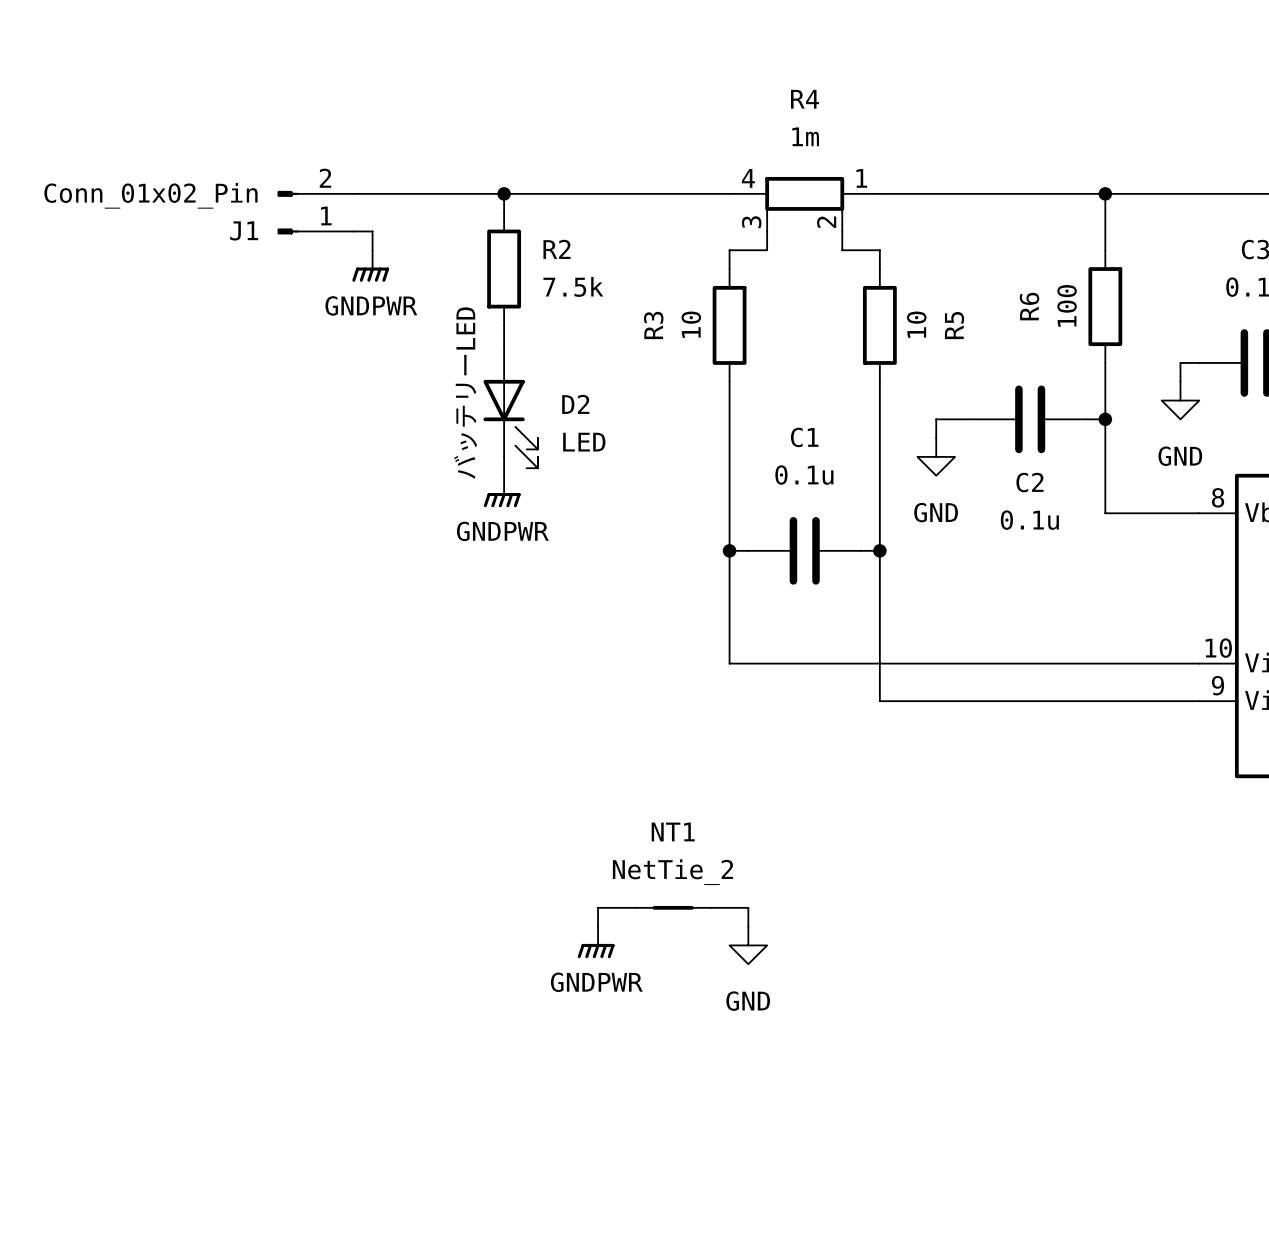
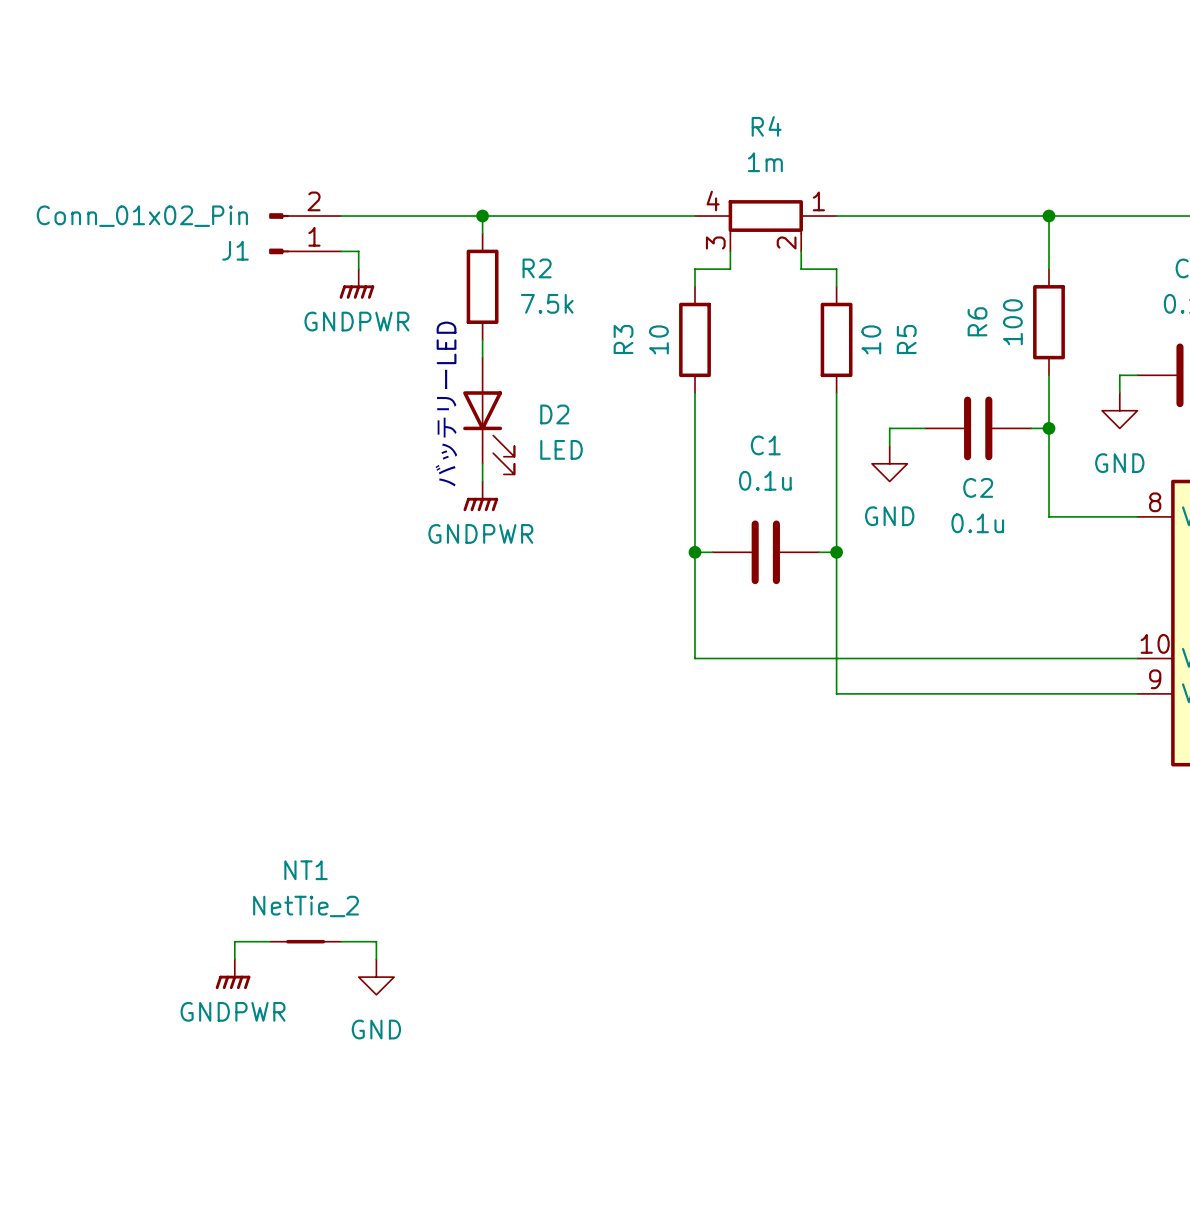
wire: (635, 907) (598, 907) (598, 926) -> (270, 941) (234, 941) (234, 959)
NT1 position: (673, 907) -> (305, 941)
wire: (710, 907) (748, 907) (748, 926) -> (341, 941) (376, 941) (376, 959)
power symbol position: GNDPWR (596, 942) -> GNDPWR (233, 974)
power symbol position: GND (748, 945) -> GND (376, 977)

